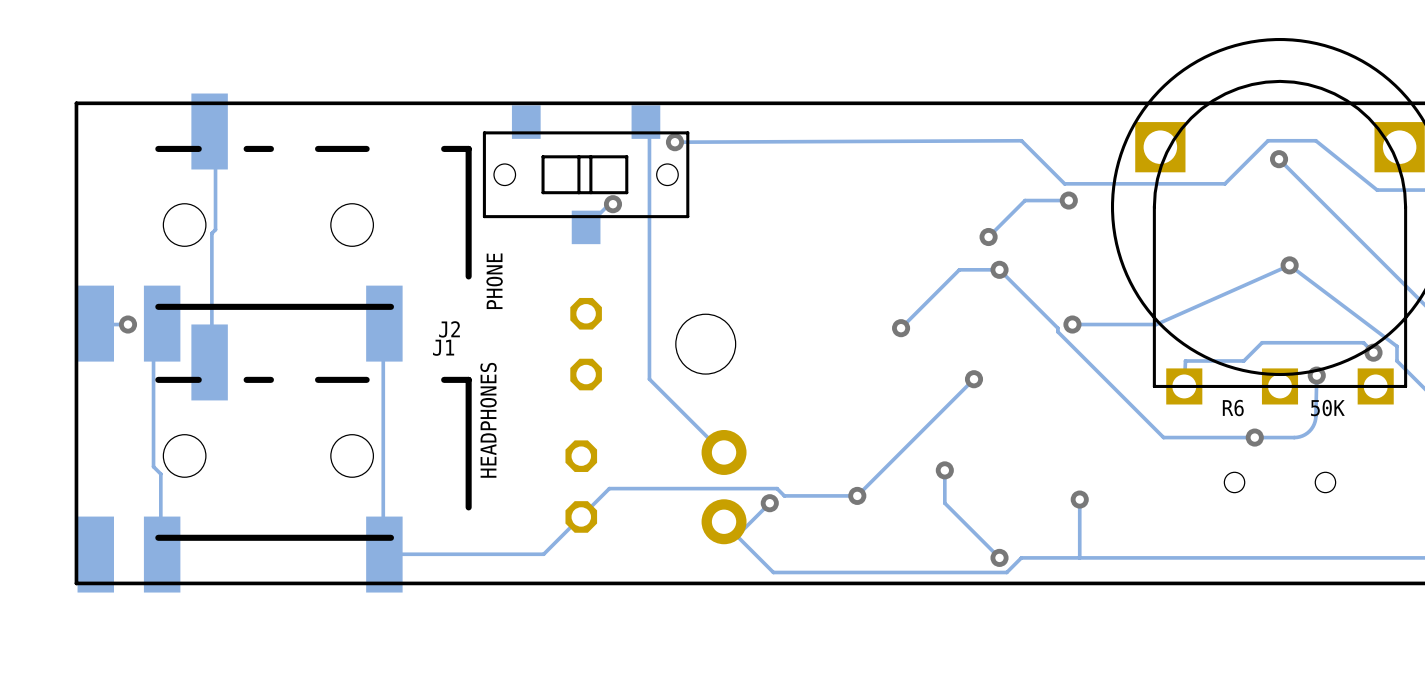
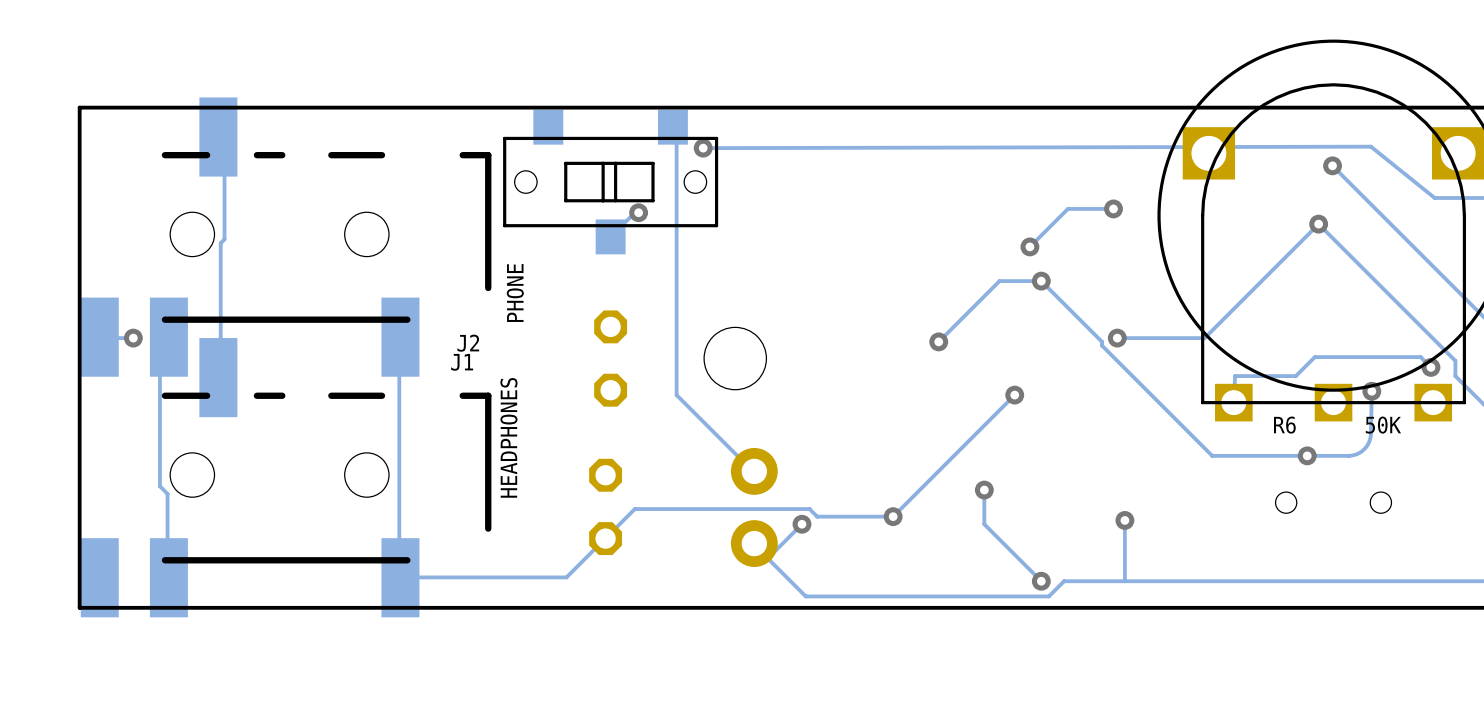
track: (1315, 140) (1268, 140) (1224, 183) (1064, 183) (1021, 140) (674, 142) -> (1370, 146) (703, 148)
via position: (1289, 265) -> (1318, 224)
track: (1156, 324) (1289, 265) (1396, 346) -> (1204, 338) (1318, 224) (1455, 360)

